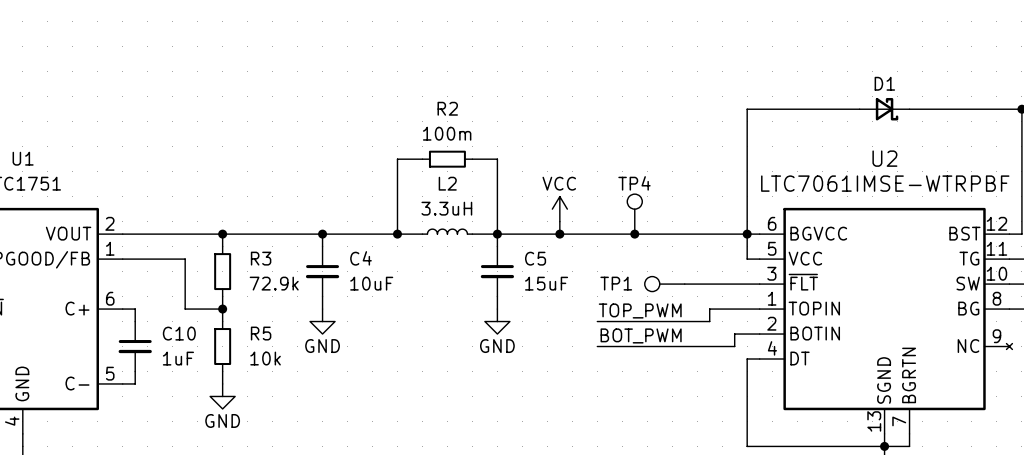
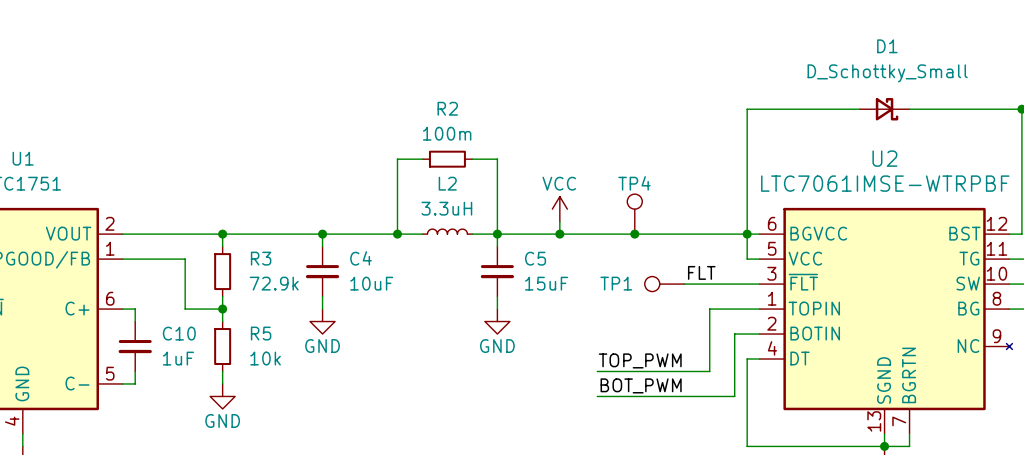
D1 value: none -> D_Schottky_Small (887, 73)
D1 name position: D1 (884, 83) -> D1 (887, 46)
label: none -> FLT (701, 272)
label position: TOP_PWM (640, 310) -> TOP_PWM (640, 360)
wire: (597, 321) (709, 321) -> (597, 371) (709, 371) (709, 321)
label position: BOT_PWM (641, 335) -> BOT_PWM (641, 385)
wire: (597, 346) (734, 346) -> (597, 396) (734, 396) (734, 346)

